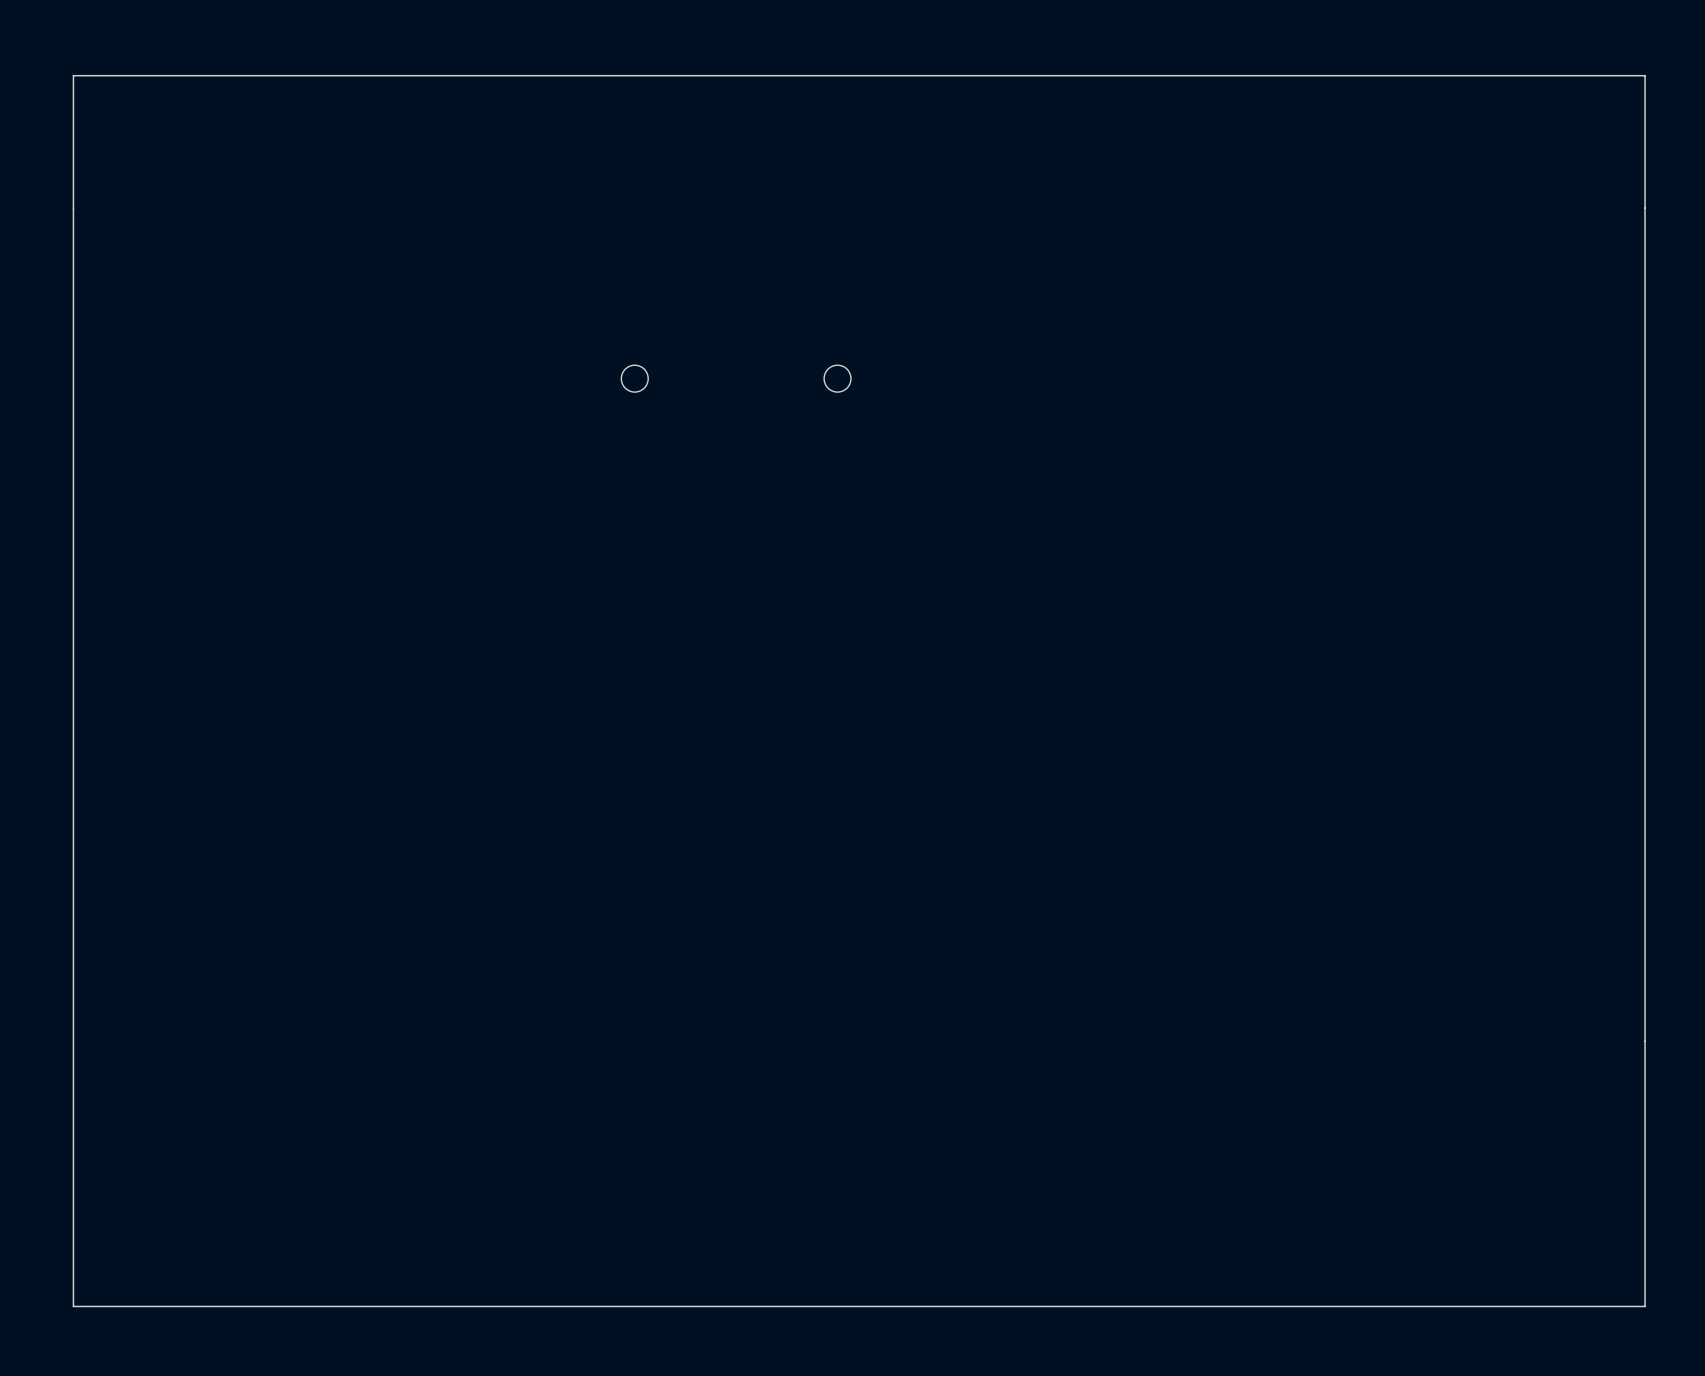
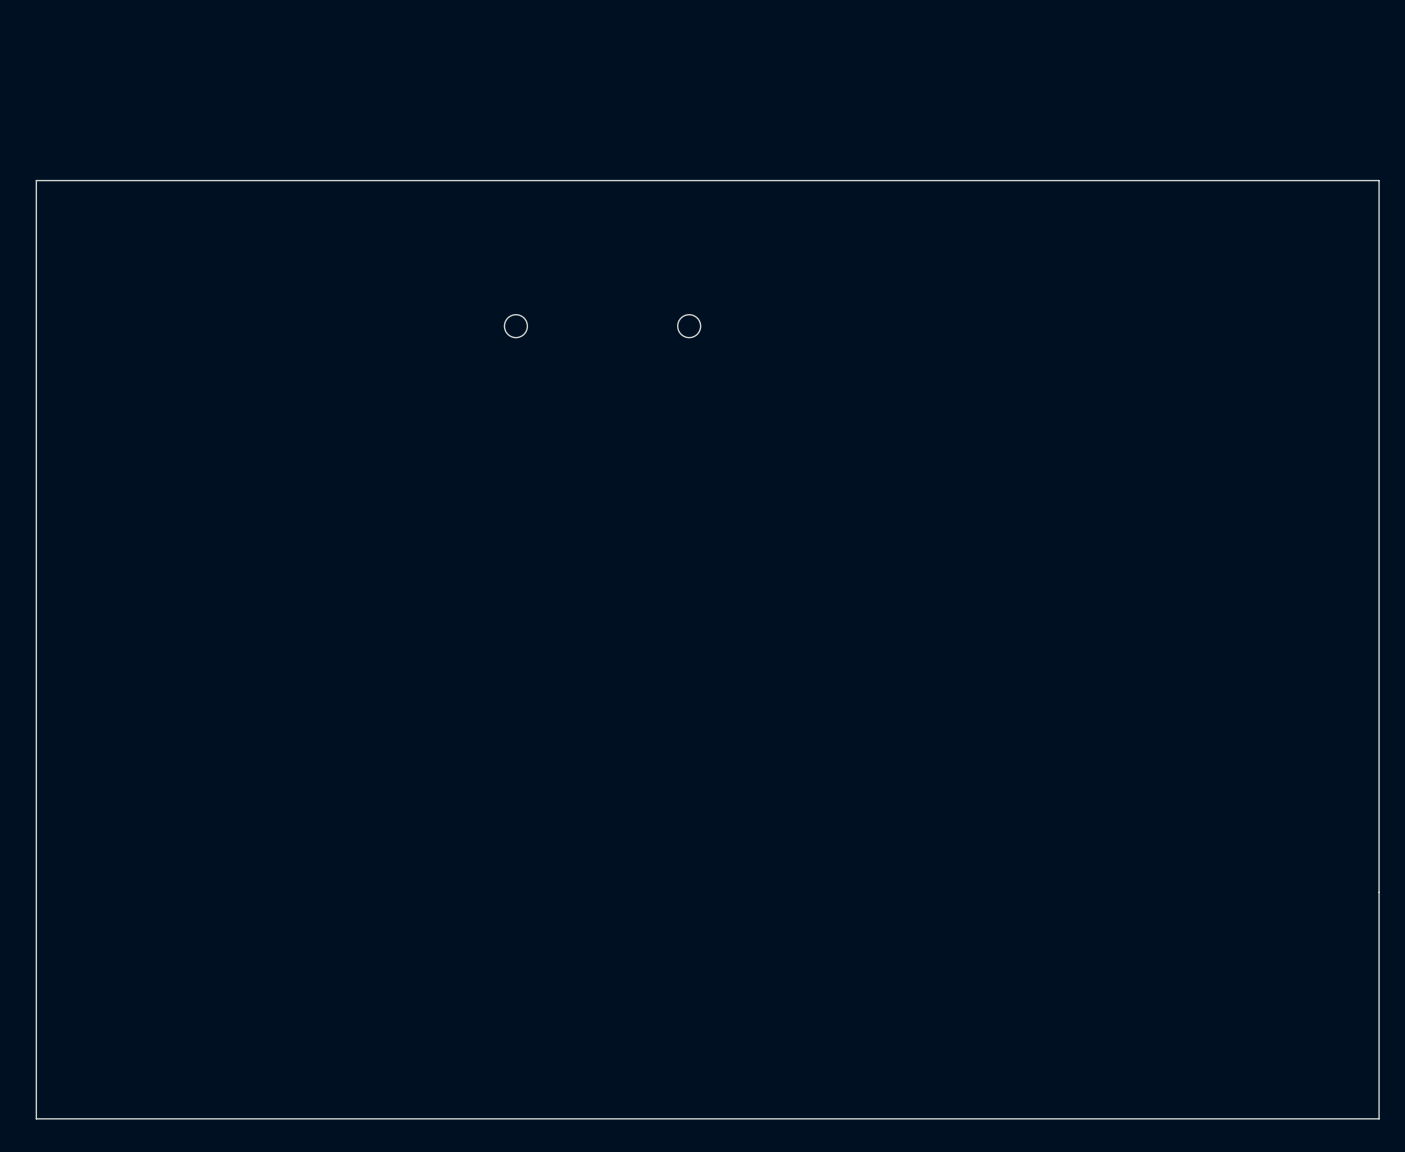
board edge: (1645, 208) (1645, 75) (73, 75) (73, 208) -> (1379, 180) (36, 180)

